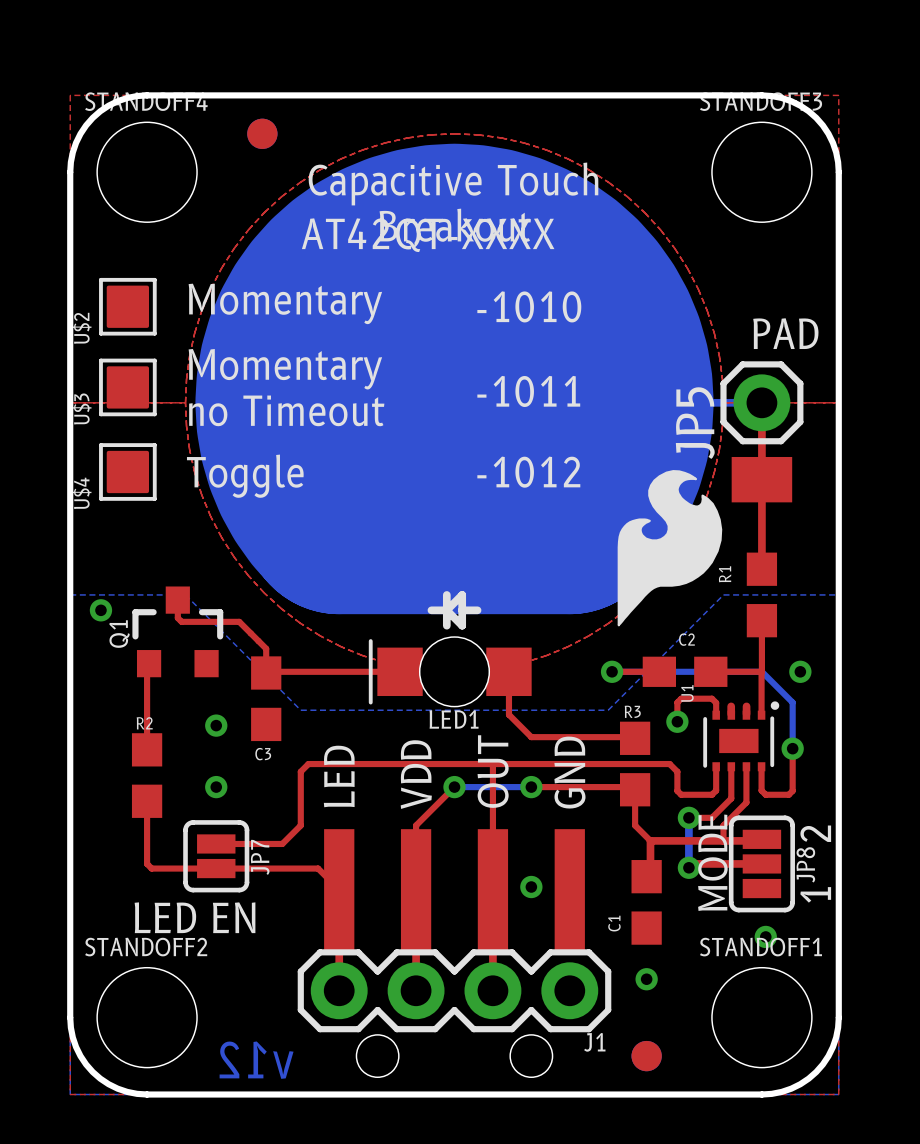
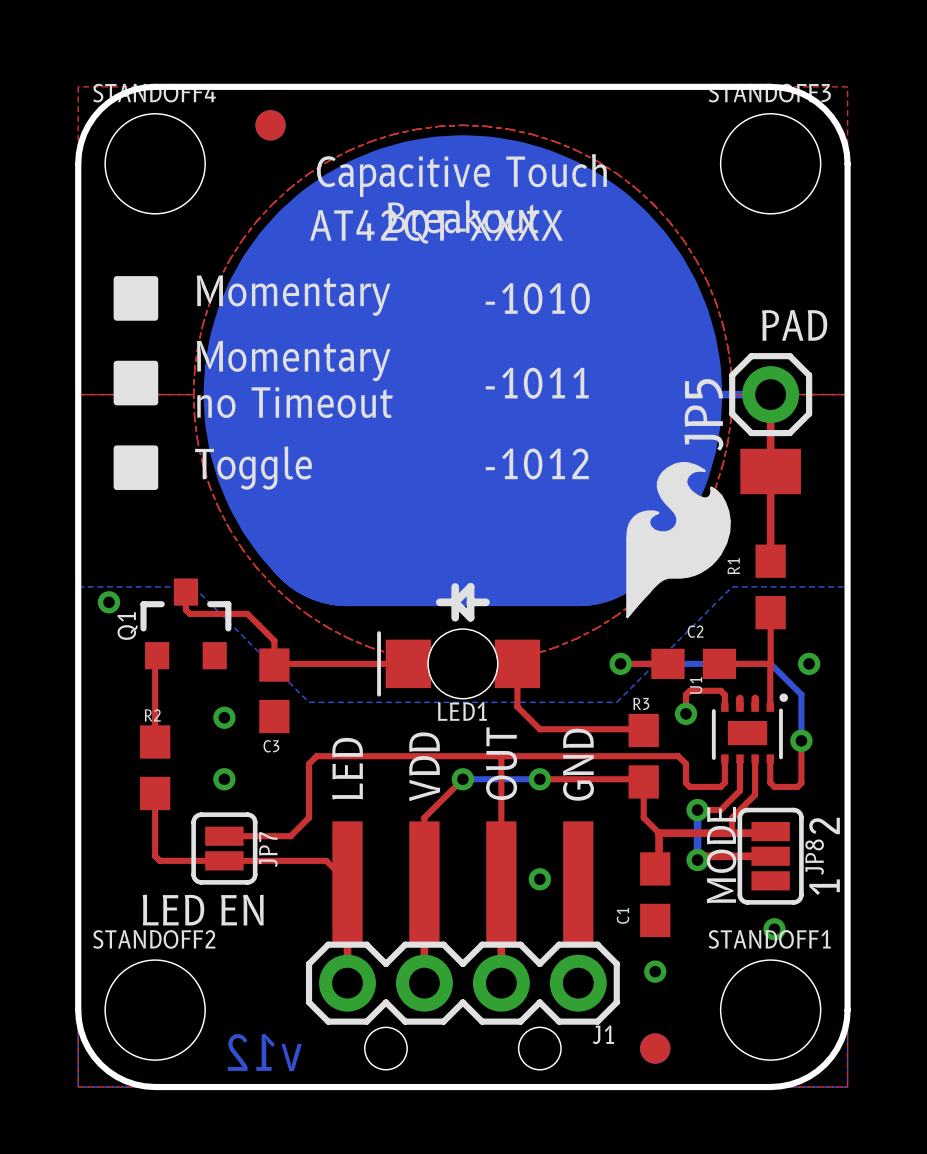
drawing: none -> [113, 276, 159, 321]
U$2: (127, 306) -> none
drawing: none -> [113, 360, 159, 406]
U$3: (127, 387) -> none
drawing: none -> [113, 445, 159, 491]
U$4: (127, 471) -> none

